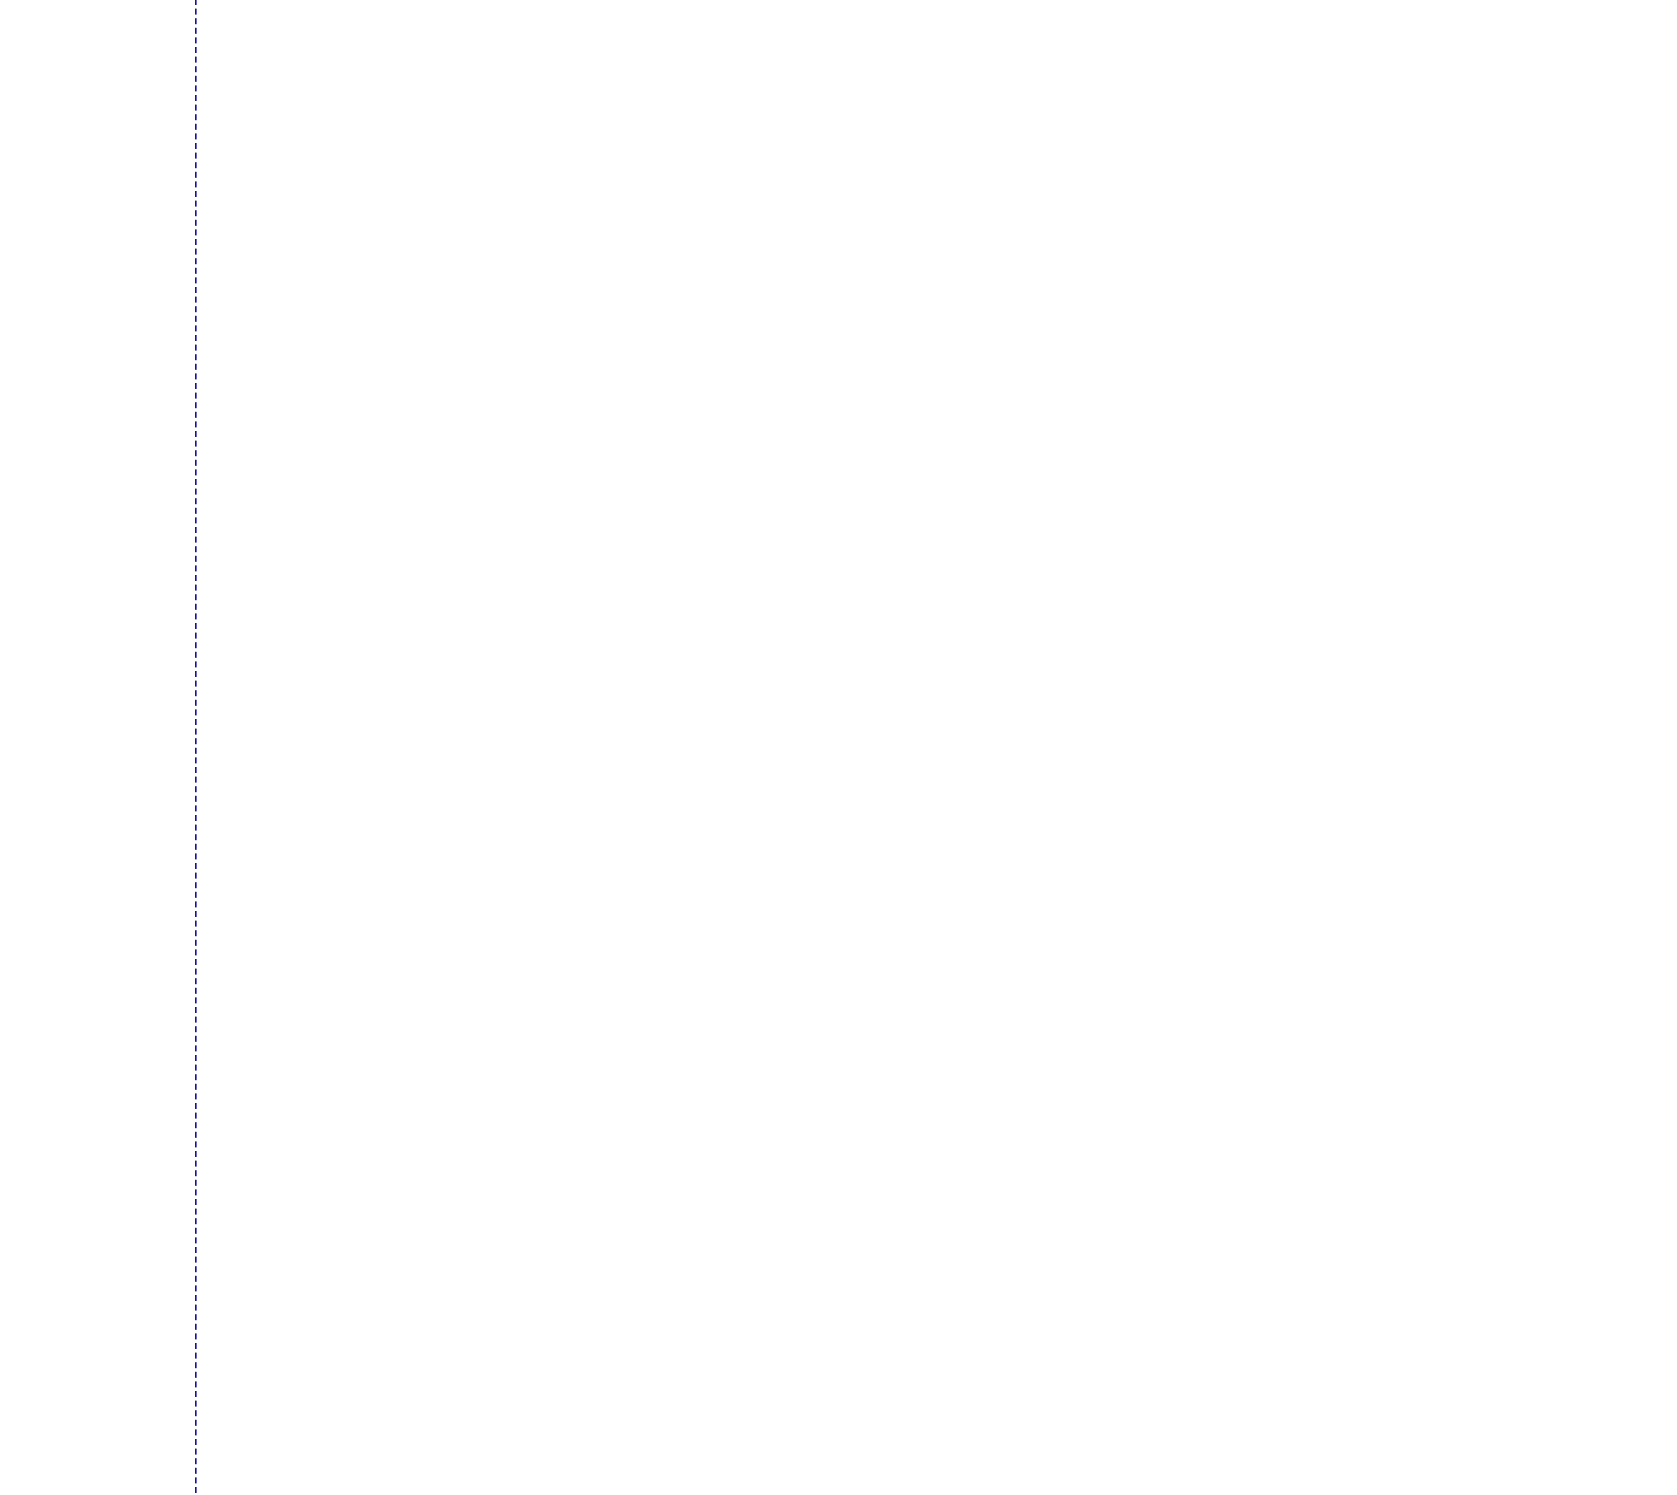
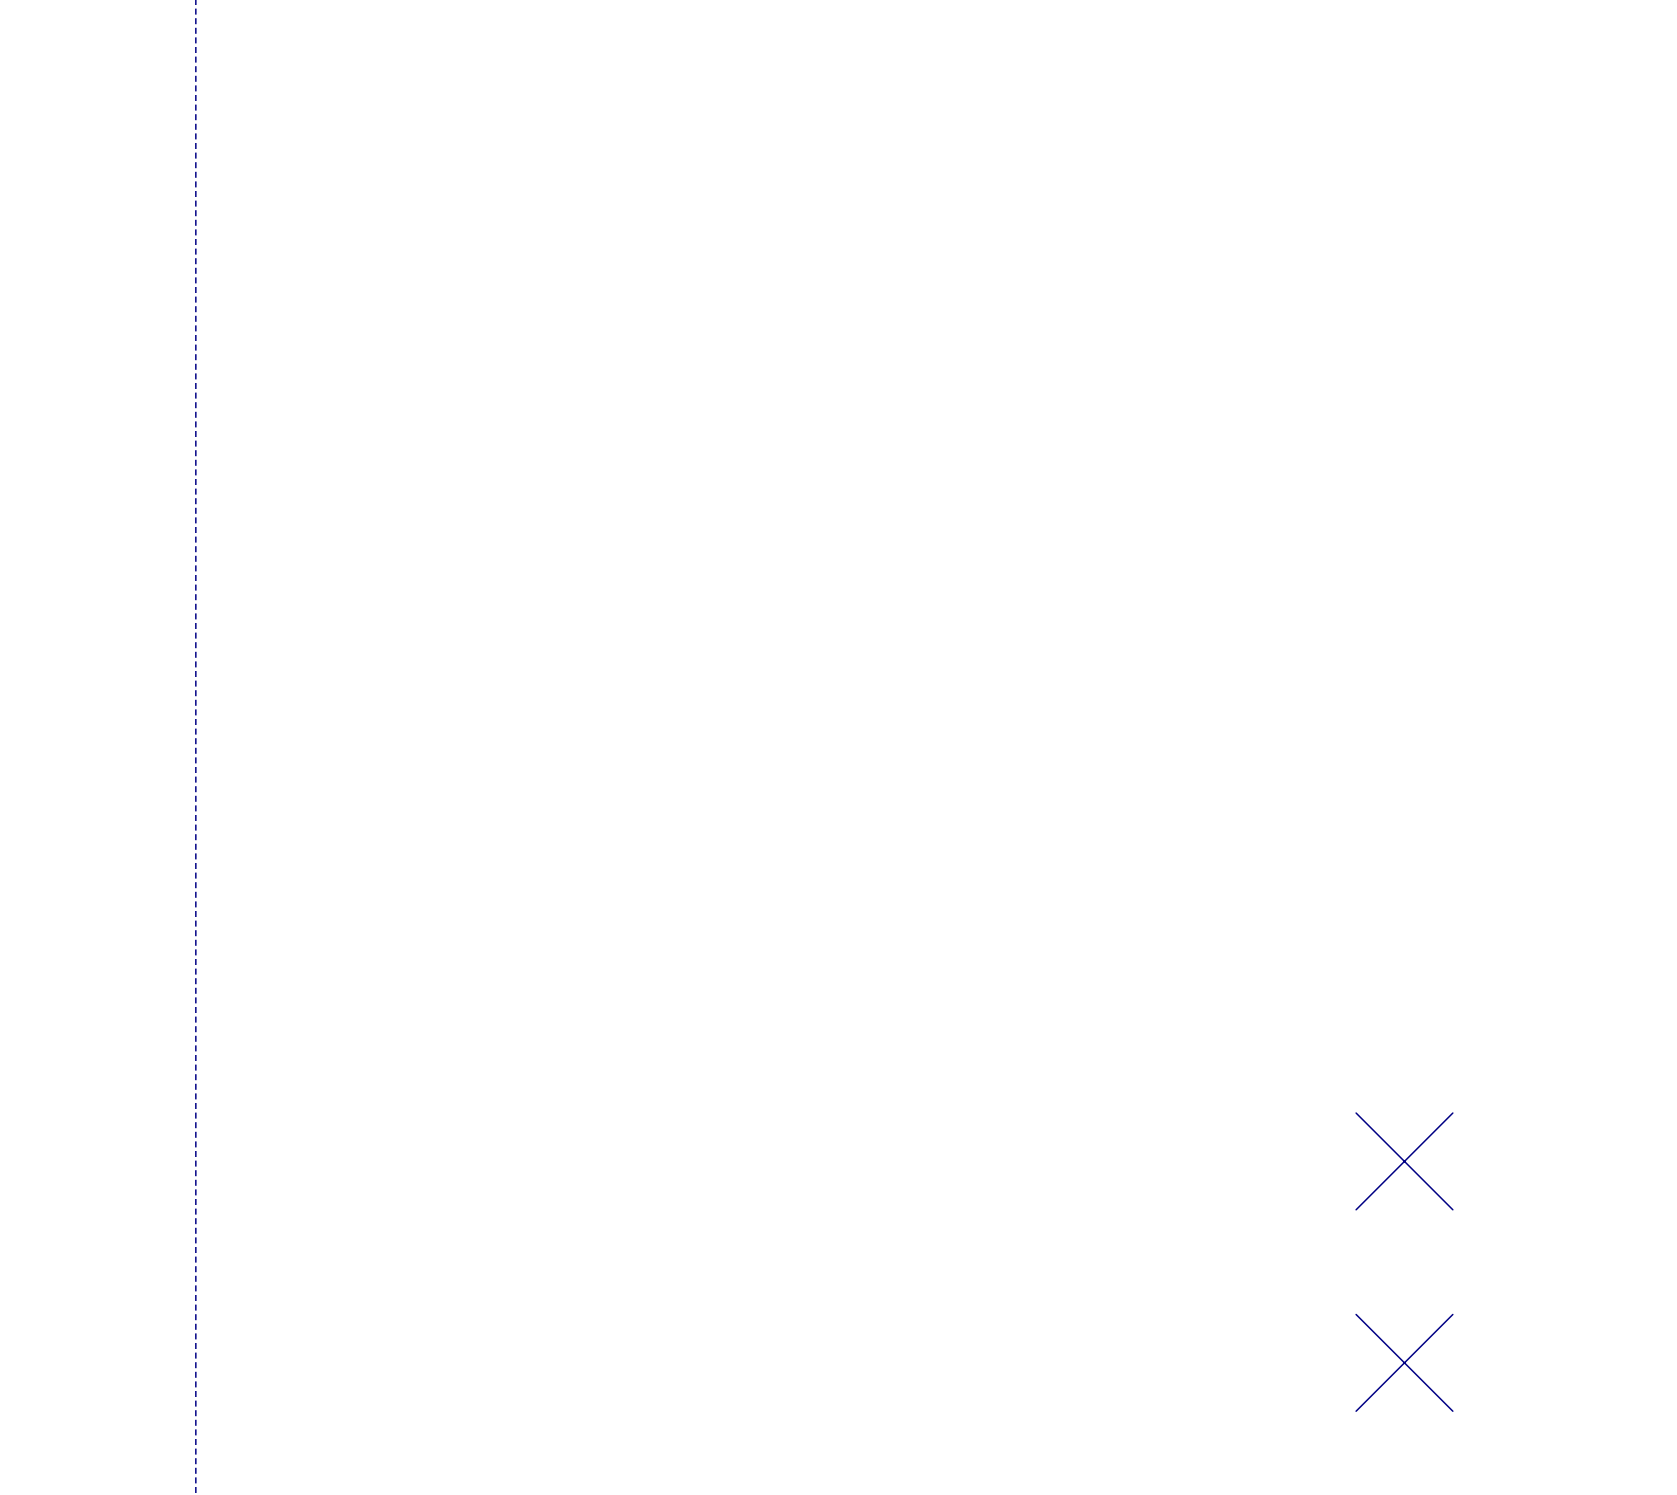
no-connect mark: none -> (1404, 1161)
no-connect mark: none -> (1404, 1362)

